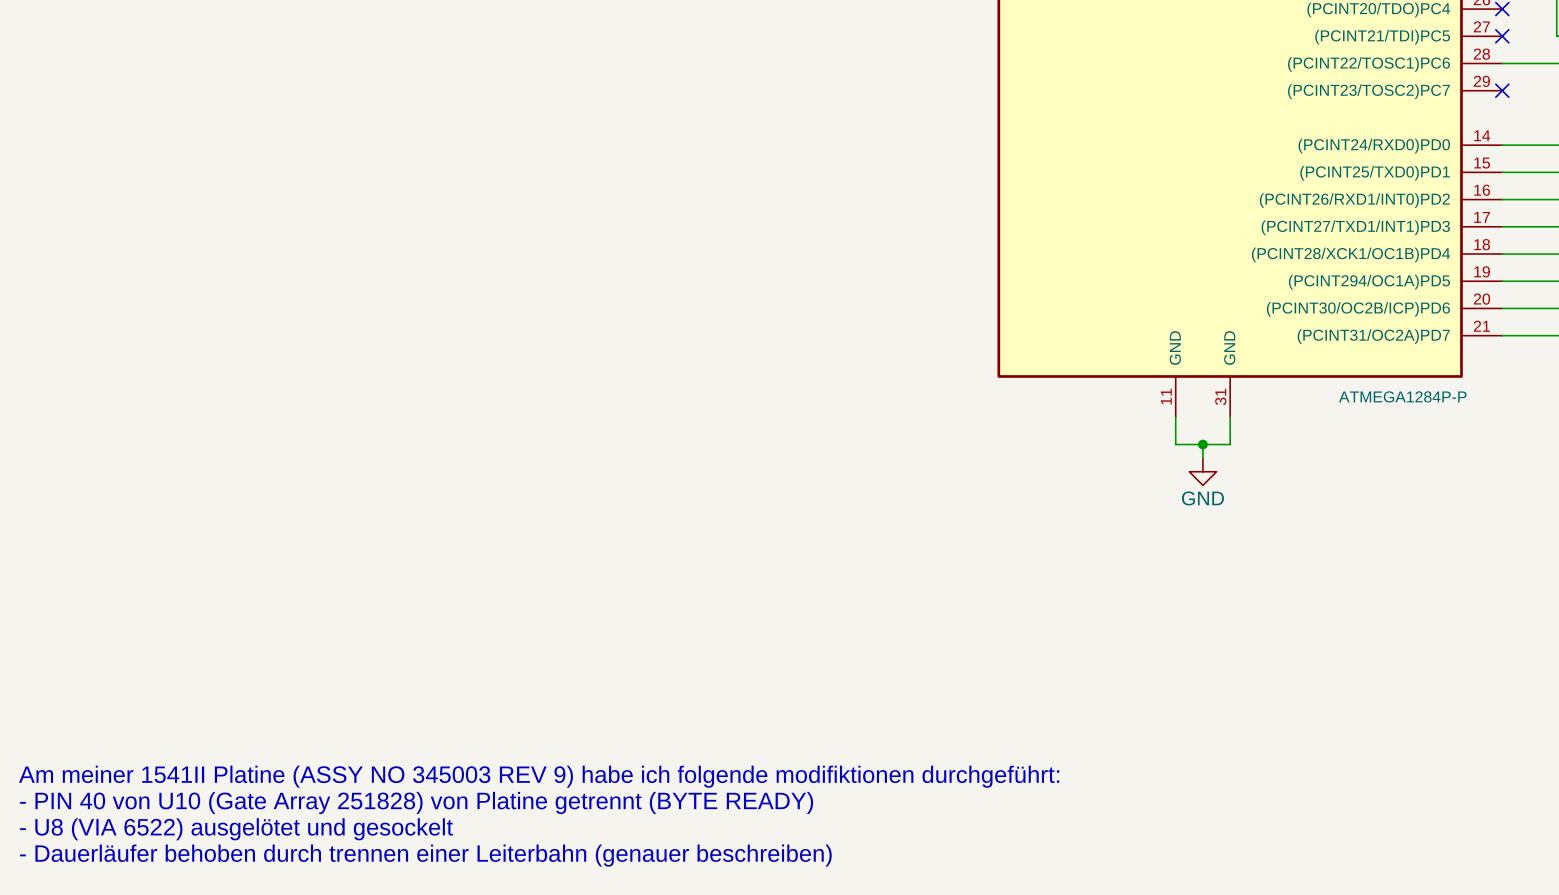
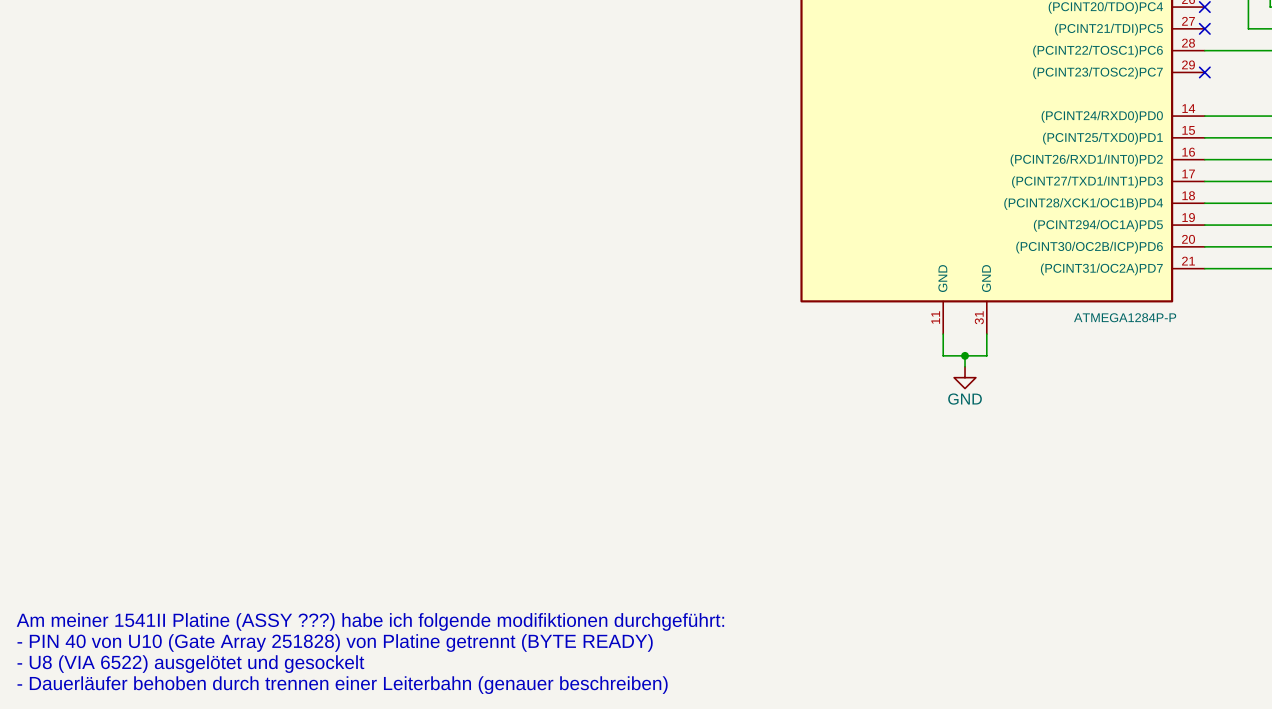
text: Am meiner 1541II Platine (ASSY NO 345003 REV 9) habe ich folgende modifiktionen durchgeführt: (539, 776) -> Am meiner 1541II Platine (ASSY ???) habe ich folgende modifiktionen durchgeführt: (370, 621)

